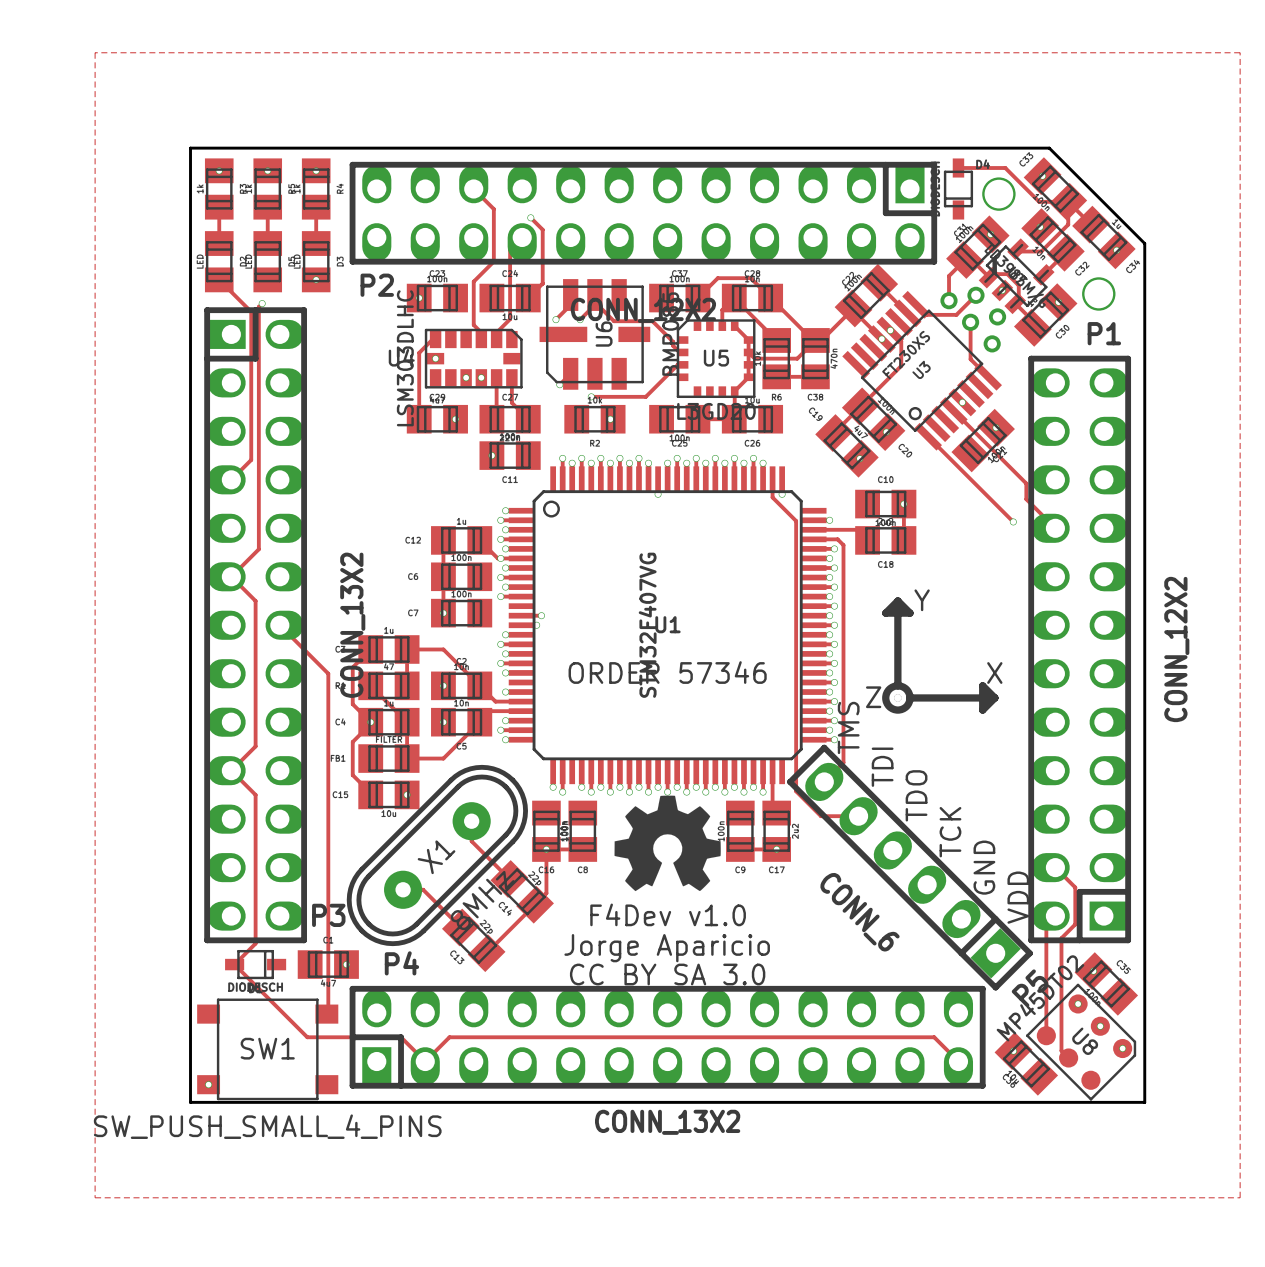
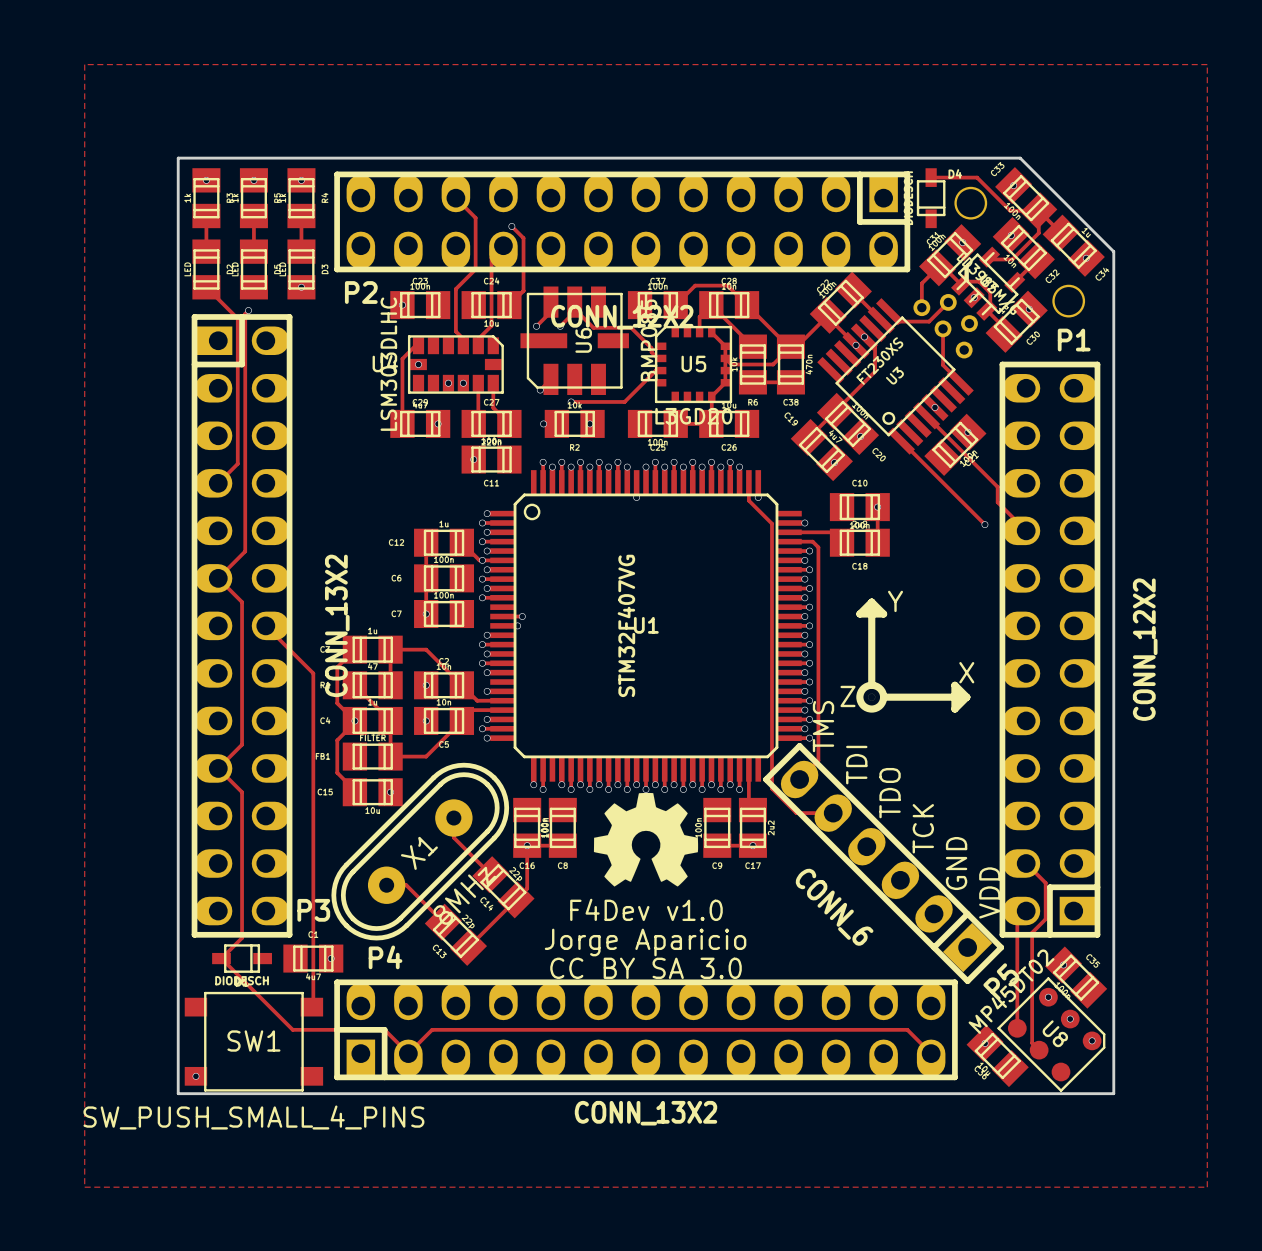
via: none -> (543, 423)
text: ORDER 57346 (667, 672) -> none

